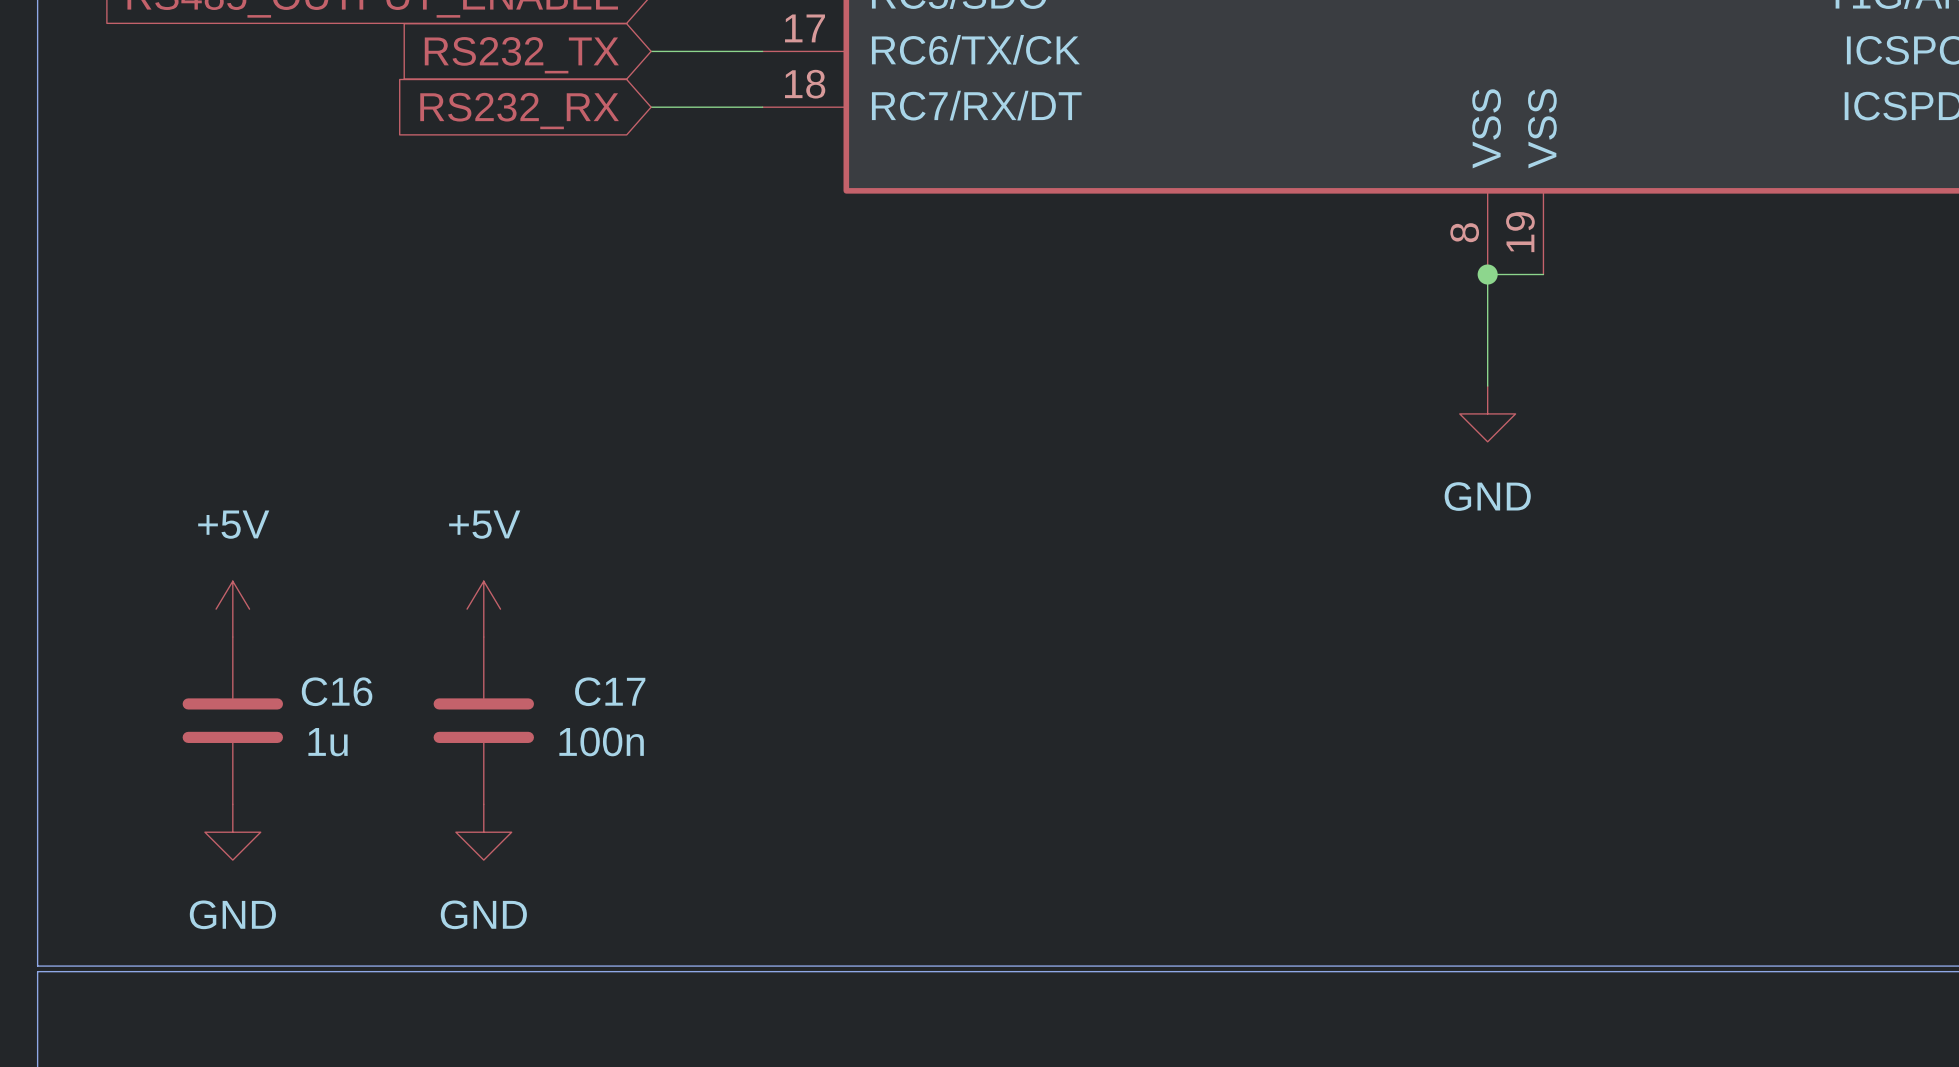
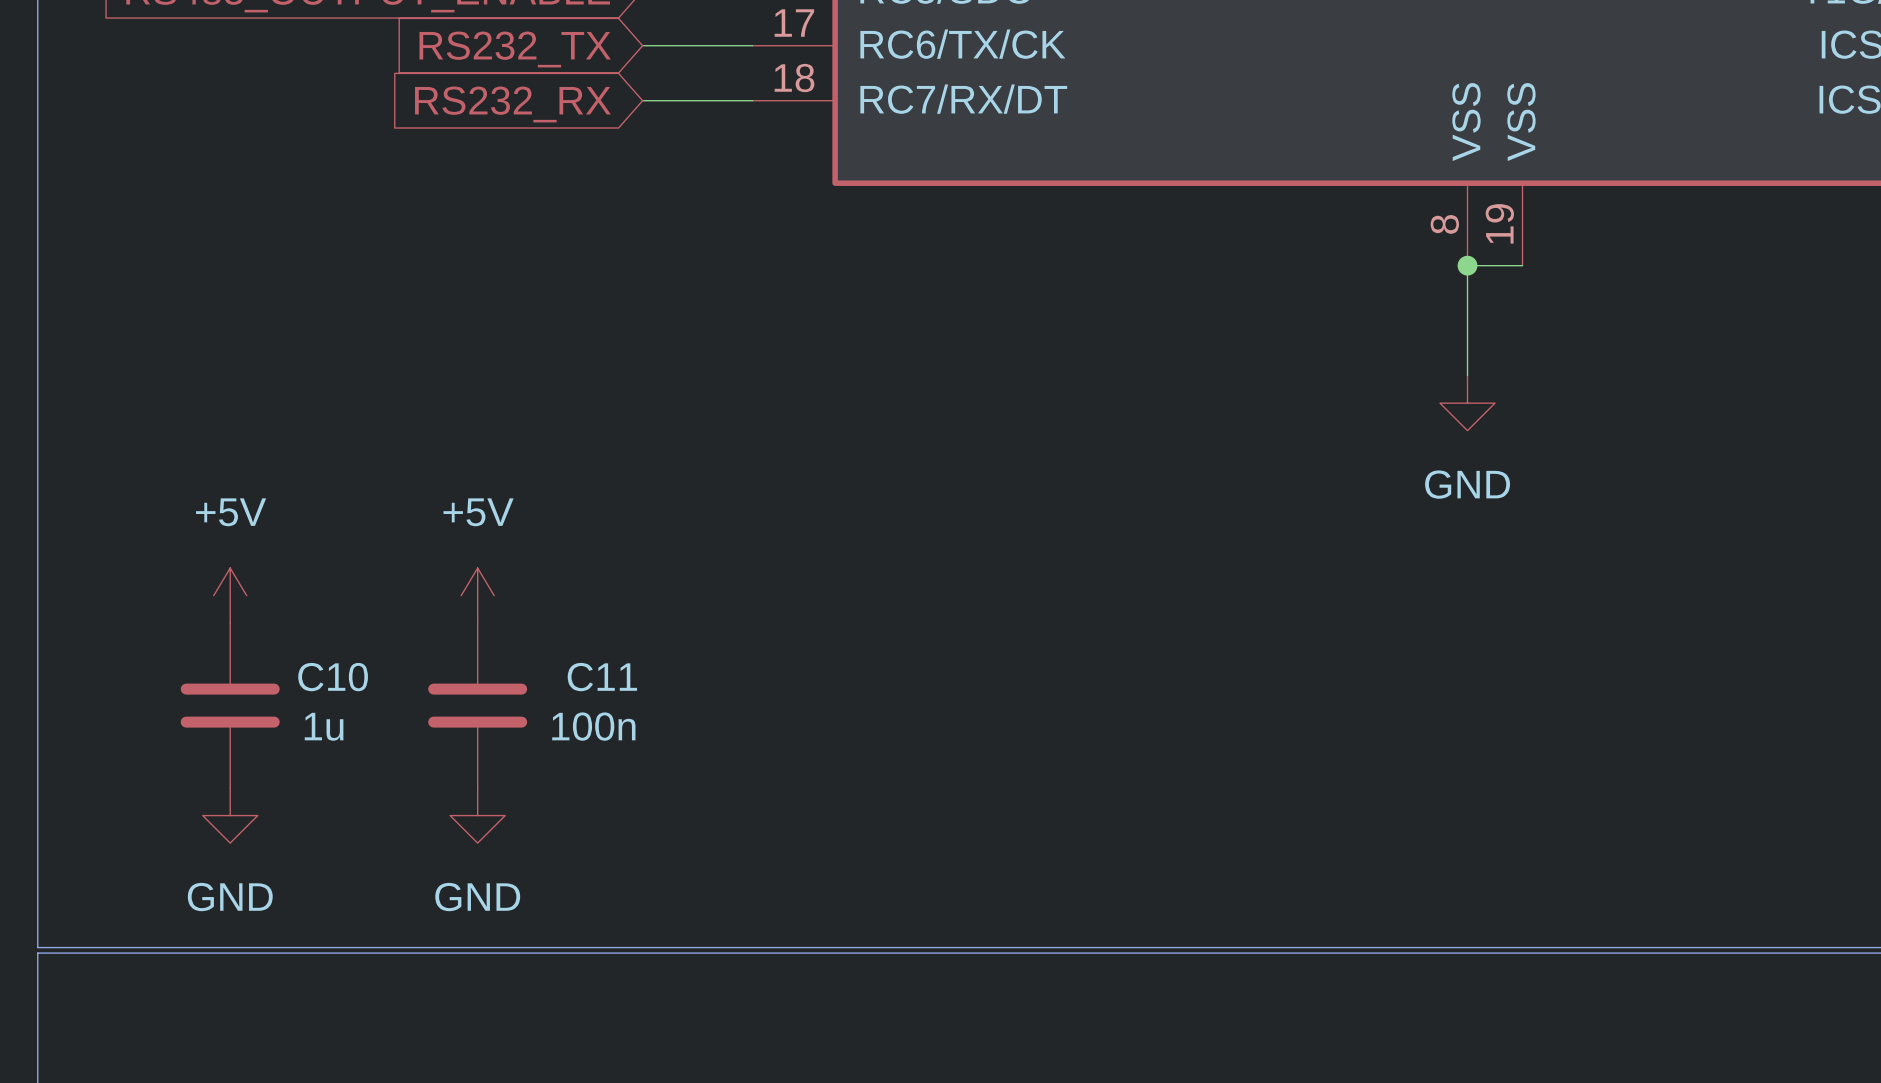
C16 name: C16 (337, 691) -> C10 (333, 677)
C17 name: C17 (610, 691) -> C11 (602, 677)

